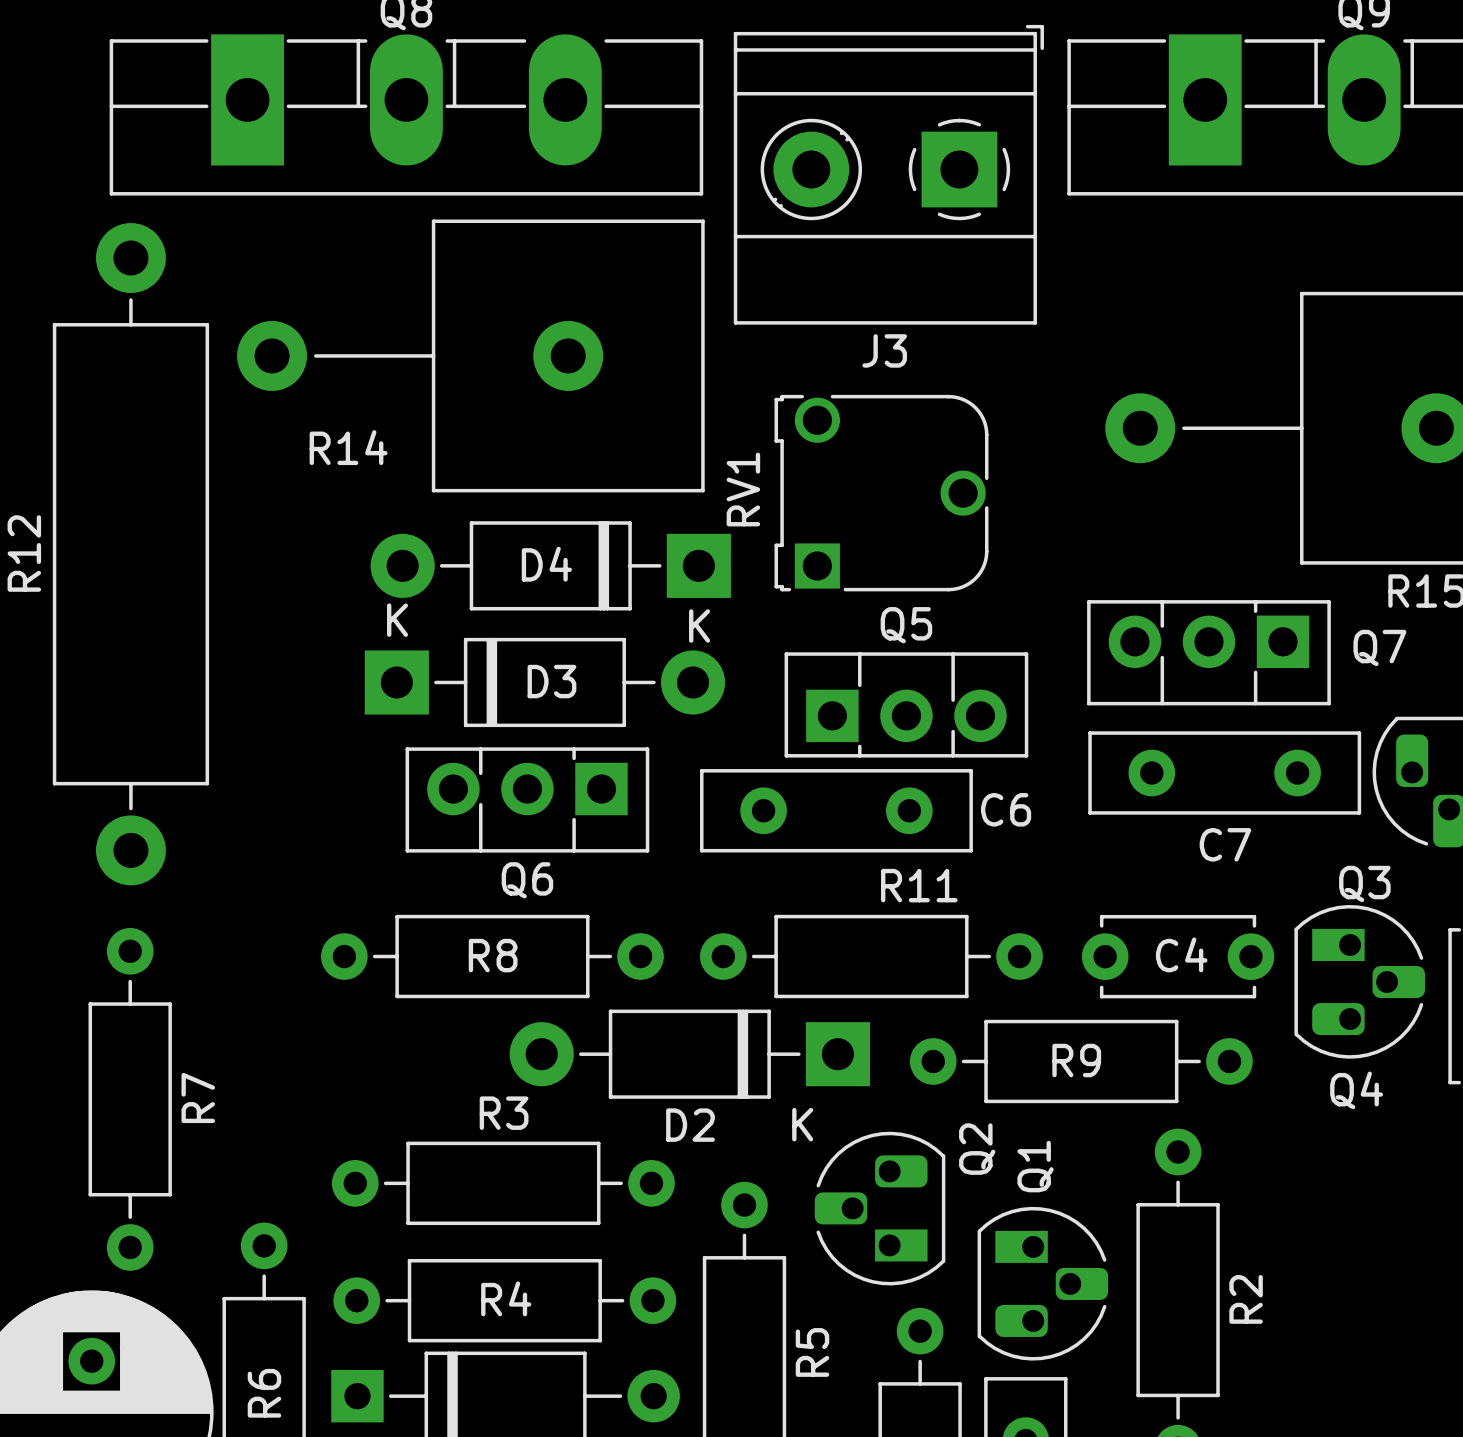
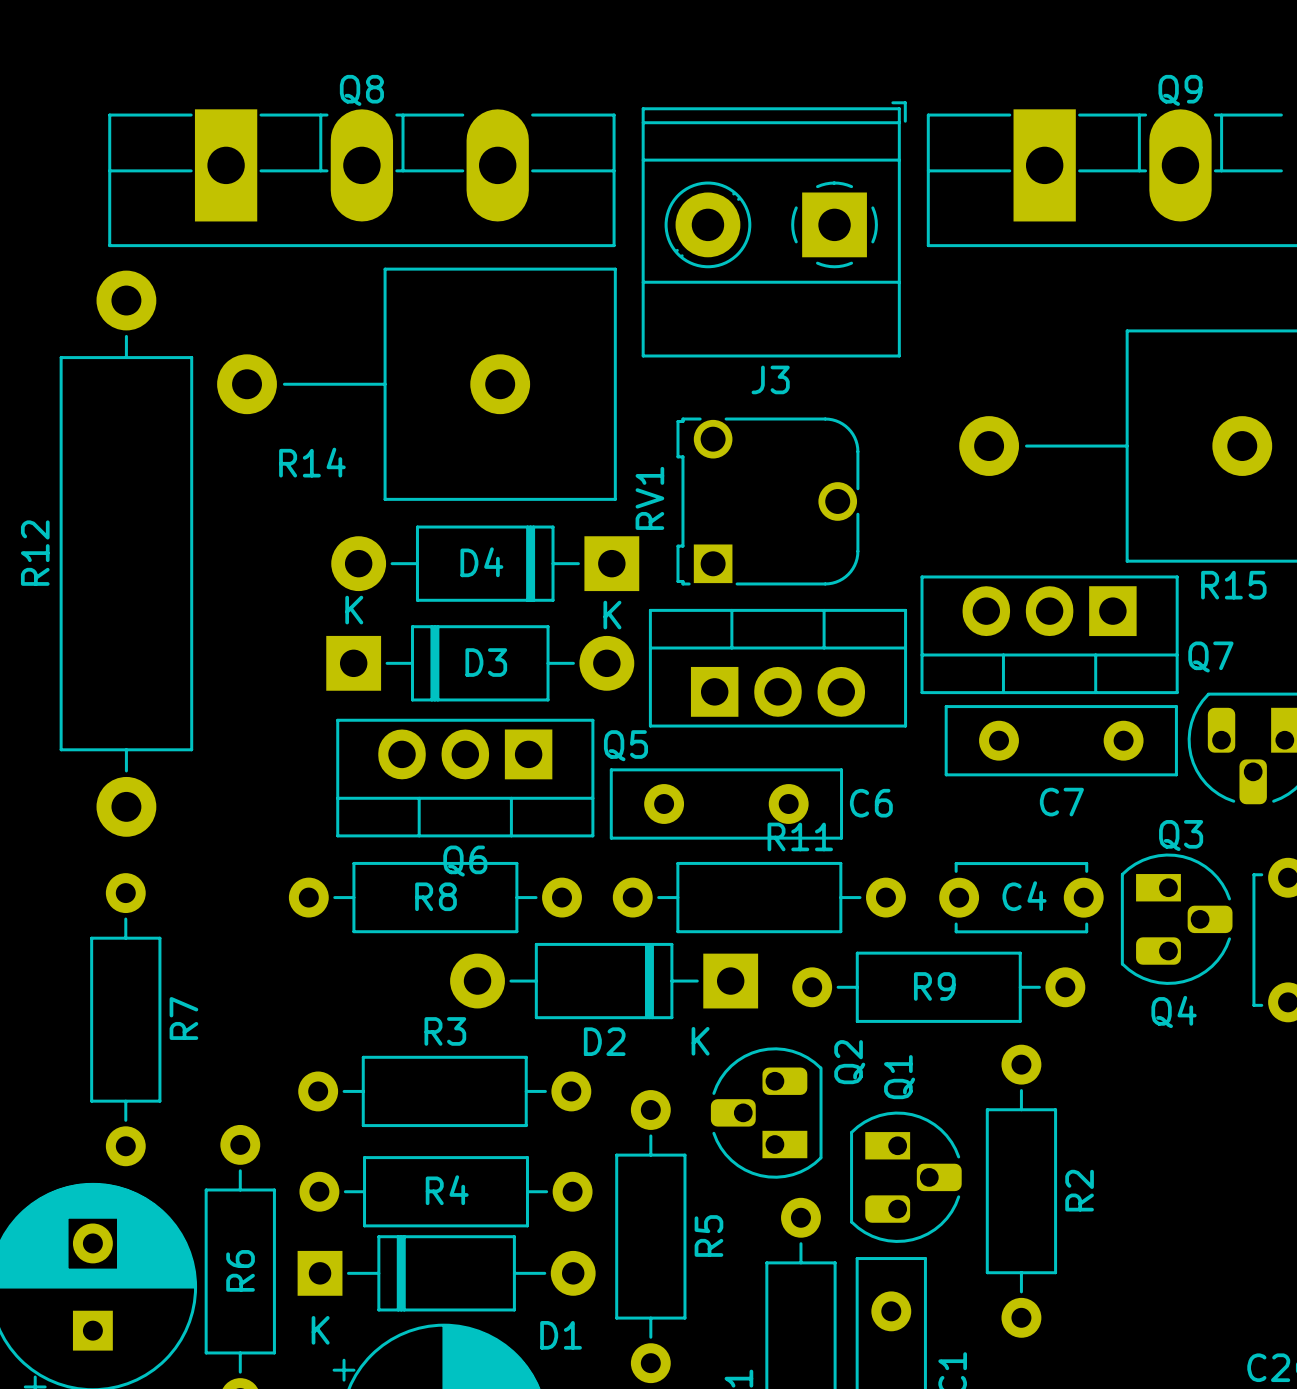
Q7 footprint: [1087, 600, 1331, 706] -> [920, 575, 1179, 695]
Q5 name position: Q5 (906, 625) -> Q5 (625, 745)
Q5 footprint: [784, 652, 1029, 758] -> [648, 608, 908, 728]
Q6 footprint: [405, 747, 650, 853] -> [336, 718, 595, 838]
C6 position: (836, 810) -> (726, 804)

